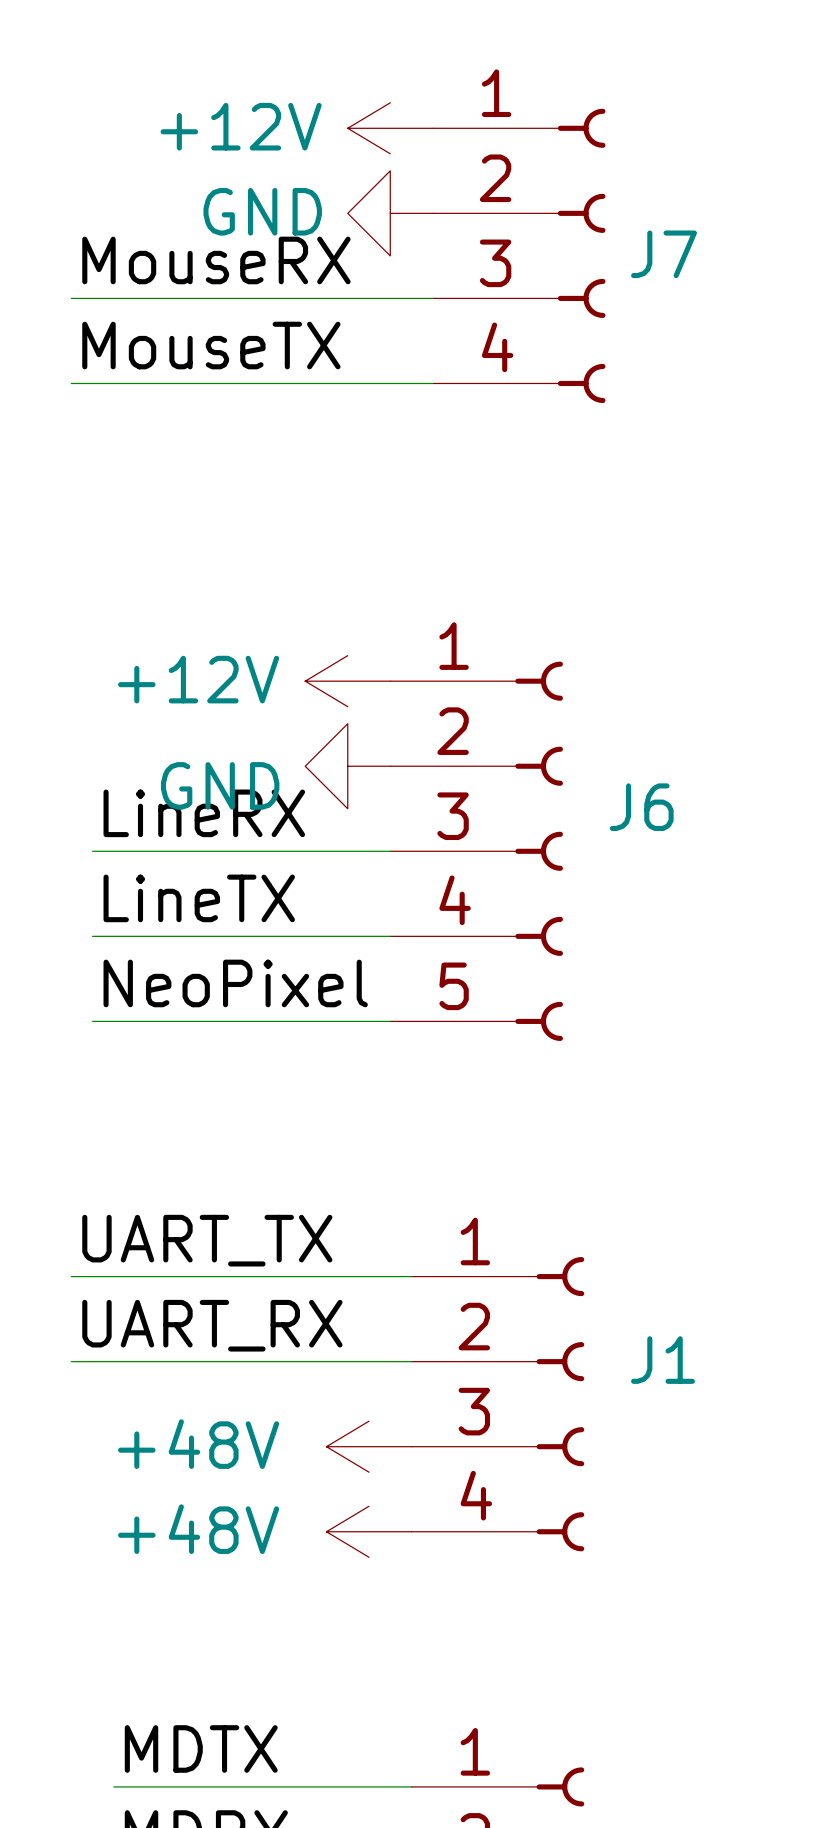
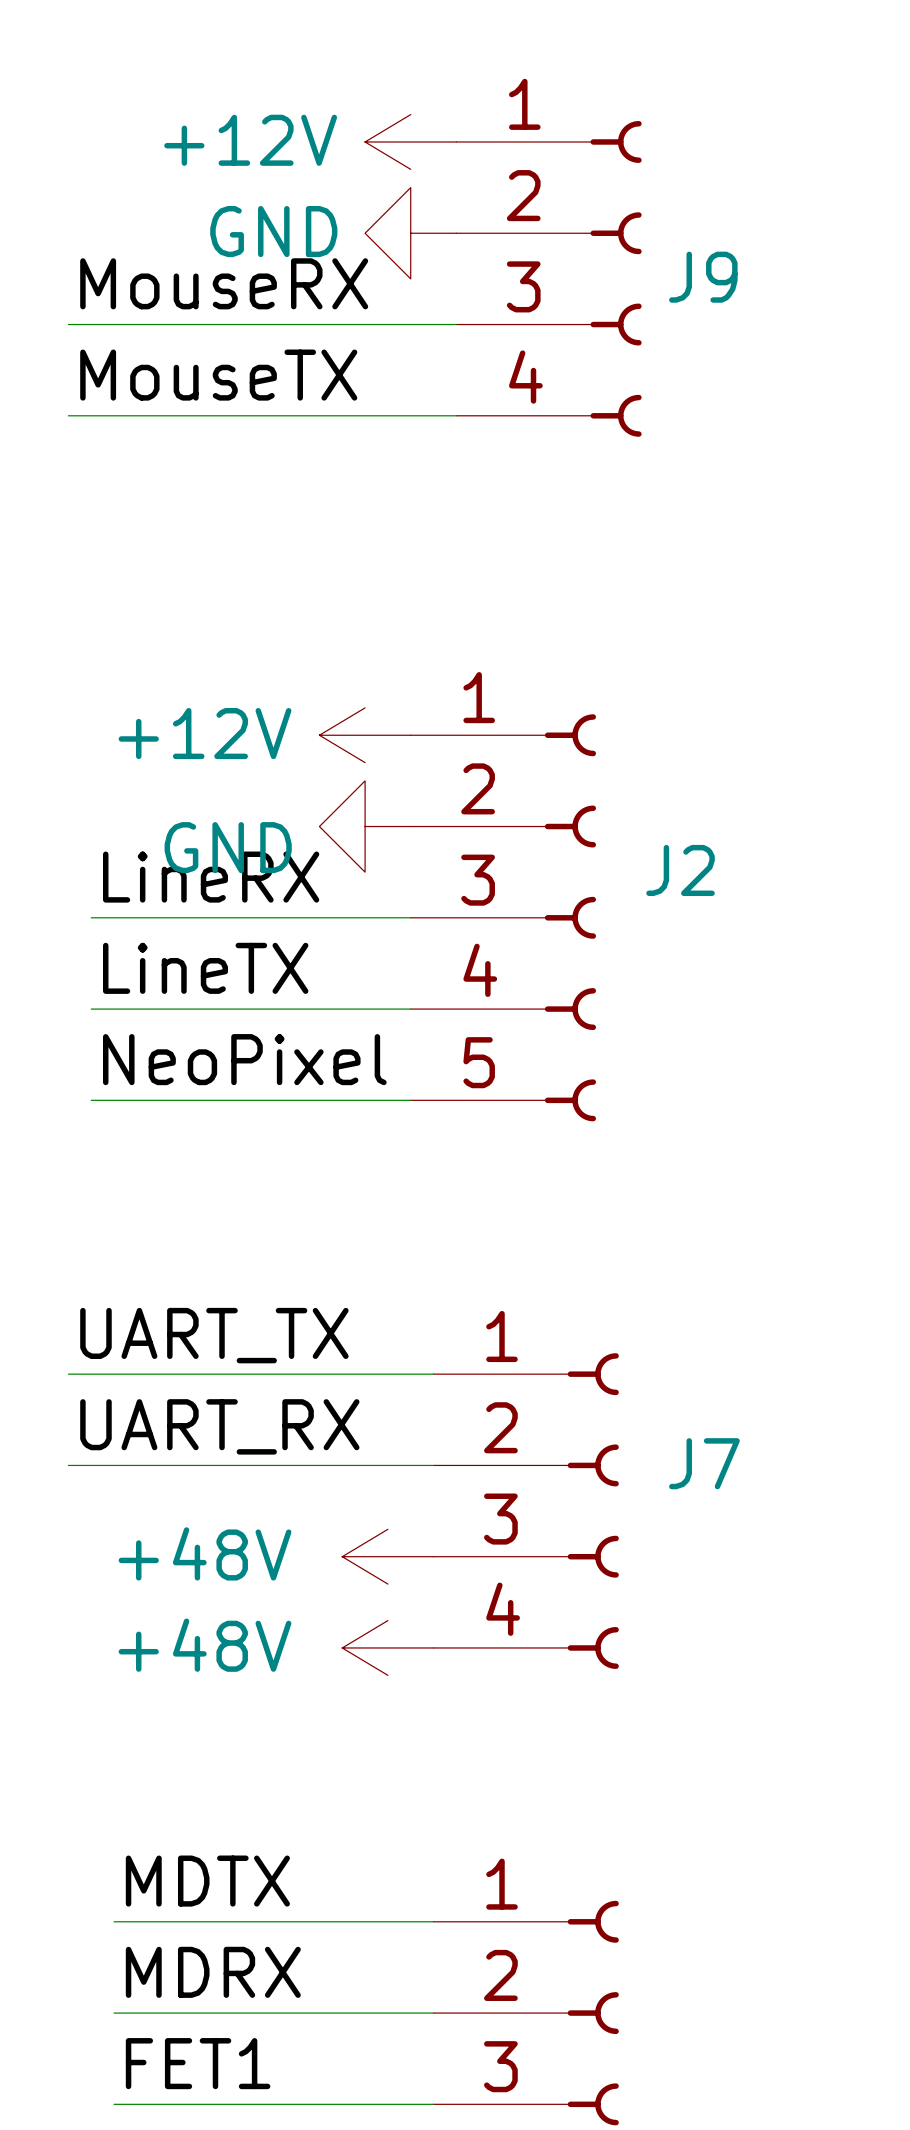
J7 name: J7 (664, 254) -> J9 (703, 277)
J6 name: J6 (641, 807) -> J2 (680, 870)
J1 name: J1 (662, 1360) -> J7 (704, 1463)

